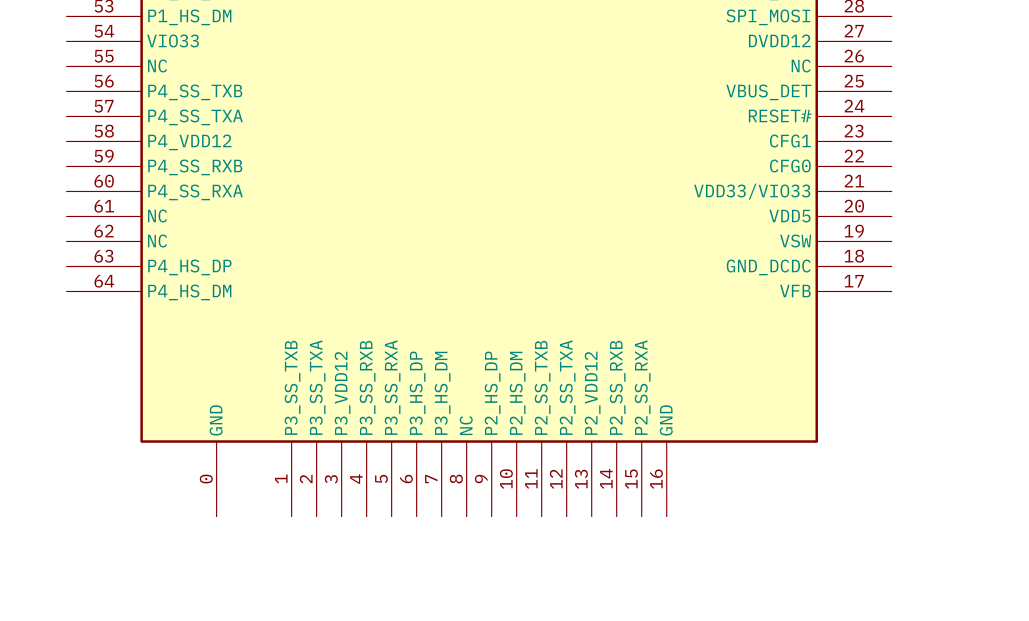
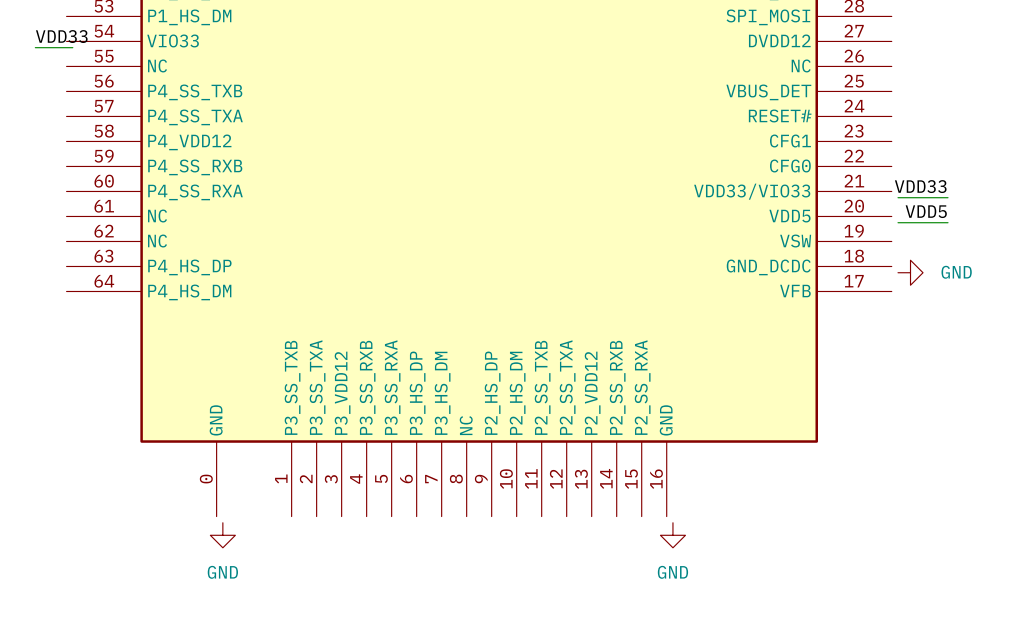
label: none -> VDD33 (61, 36)
wire: none -> (35, 47) (72, 47)
label: none -> VDD33 (920, 186)
wire: none -> (898, 197) (948, 197)
label: none -> VDD5 (926, 211)
wire: none -> (898, 222) (948, 222)
power symbol: none -> GND (910, 272)
power symbol: none -> GND (222, 535)
power symbol: none -> GND (672, 535)

